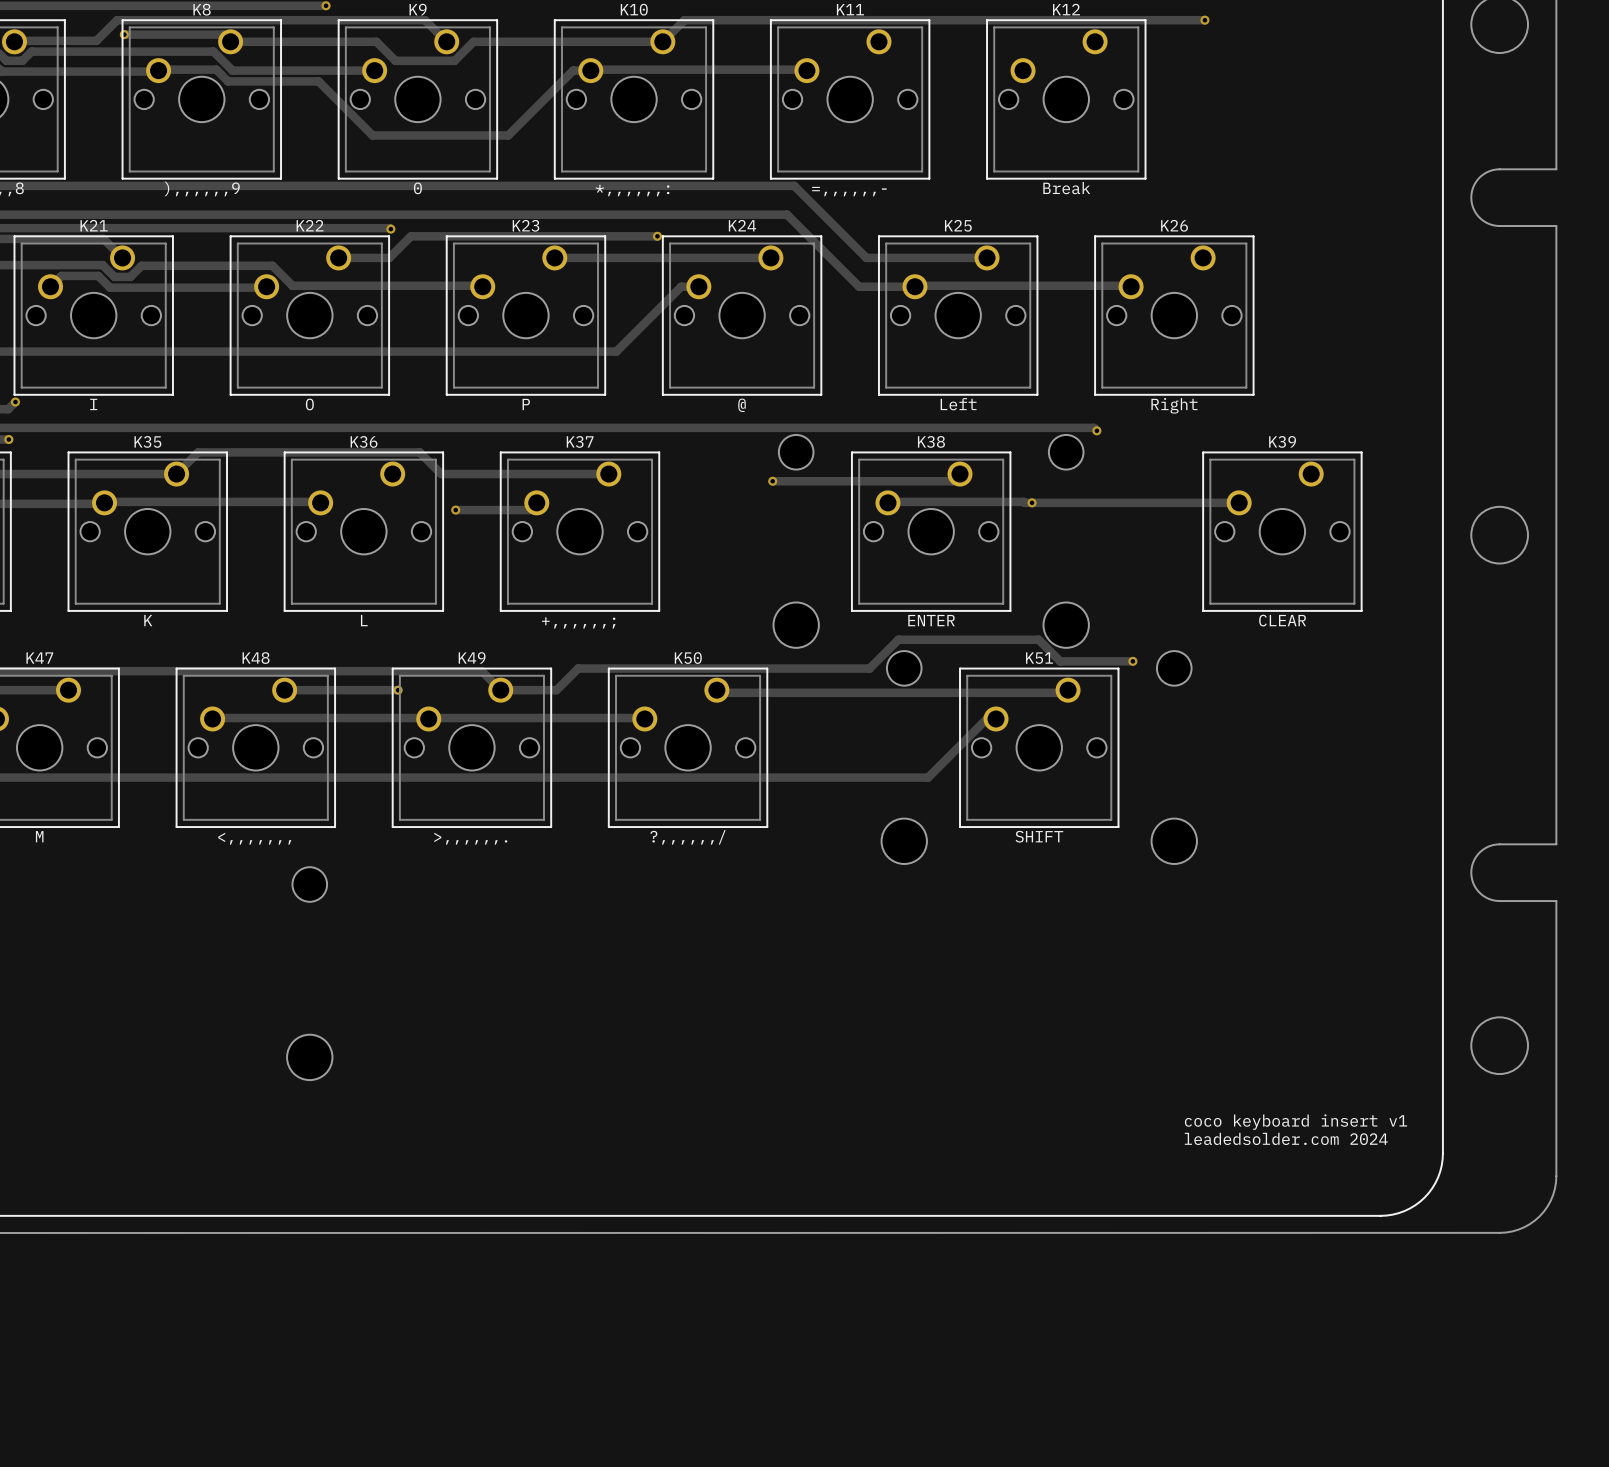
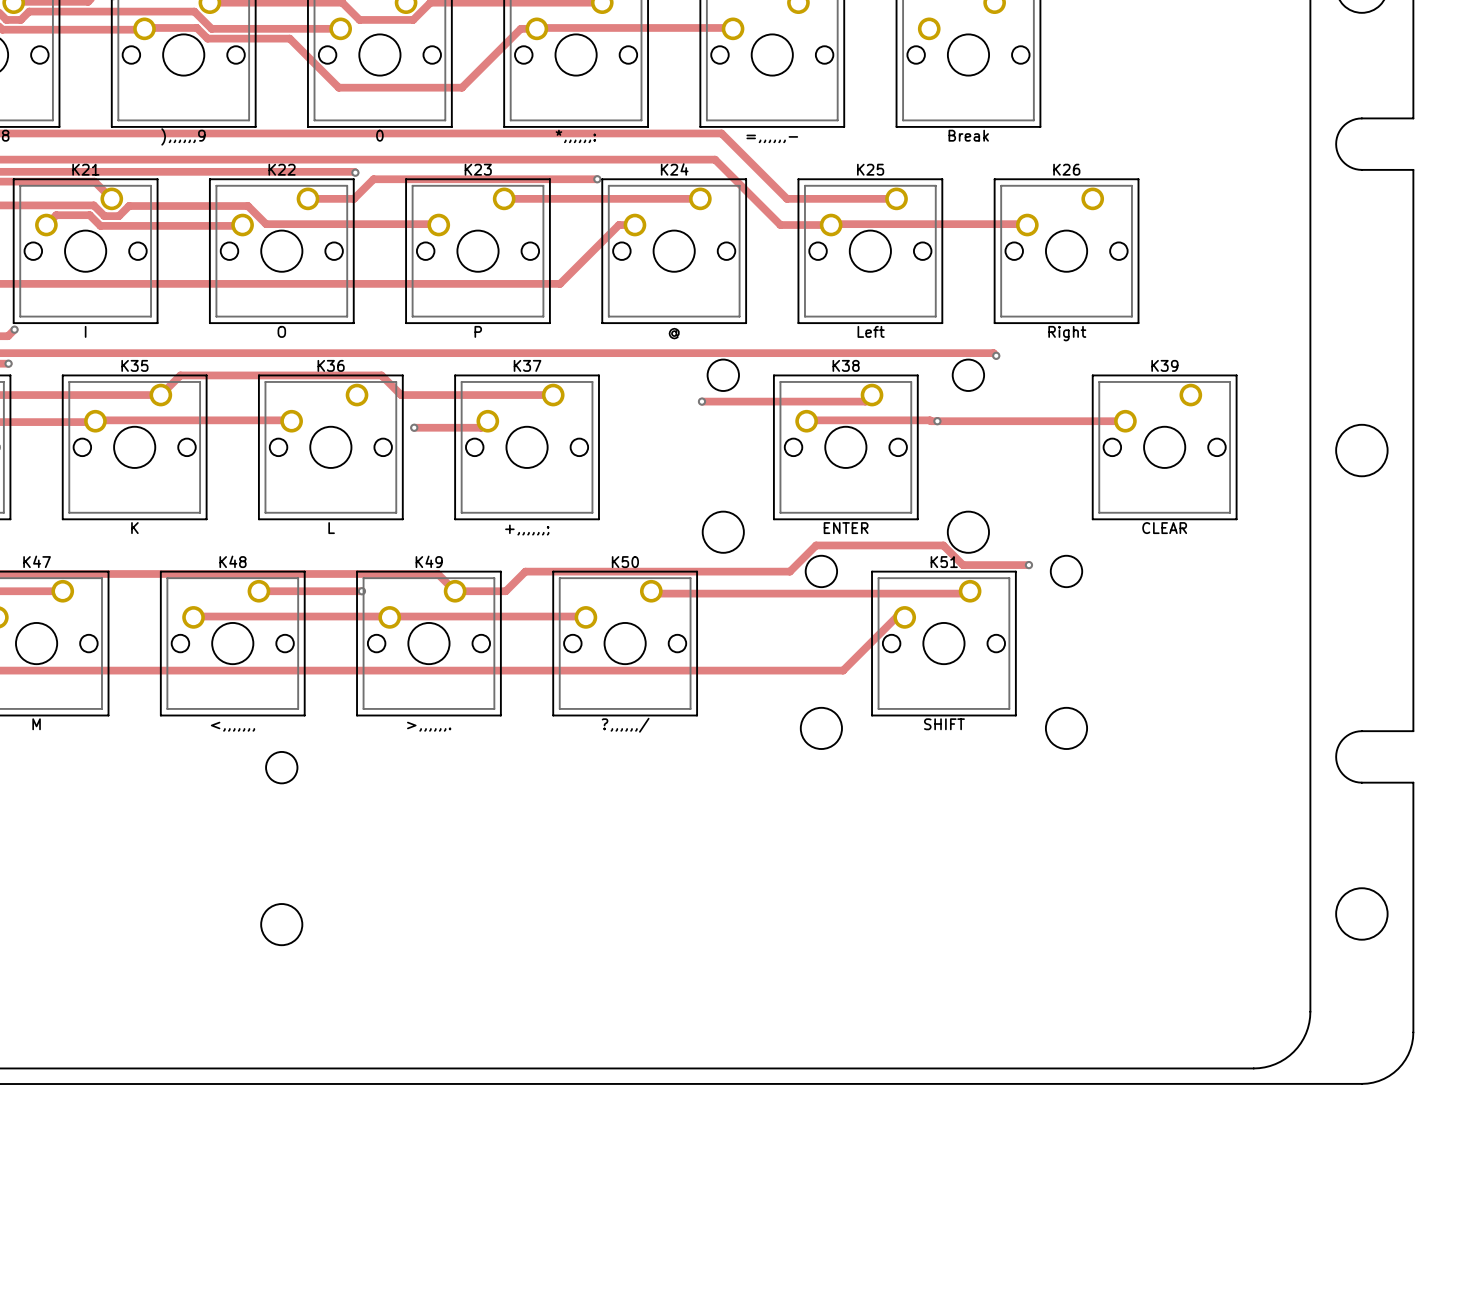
text: coco keyboard insert v1 (1295, 1122) -> none
text: leadedsolder.com 2024 (1286, 1138) -> none

